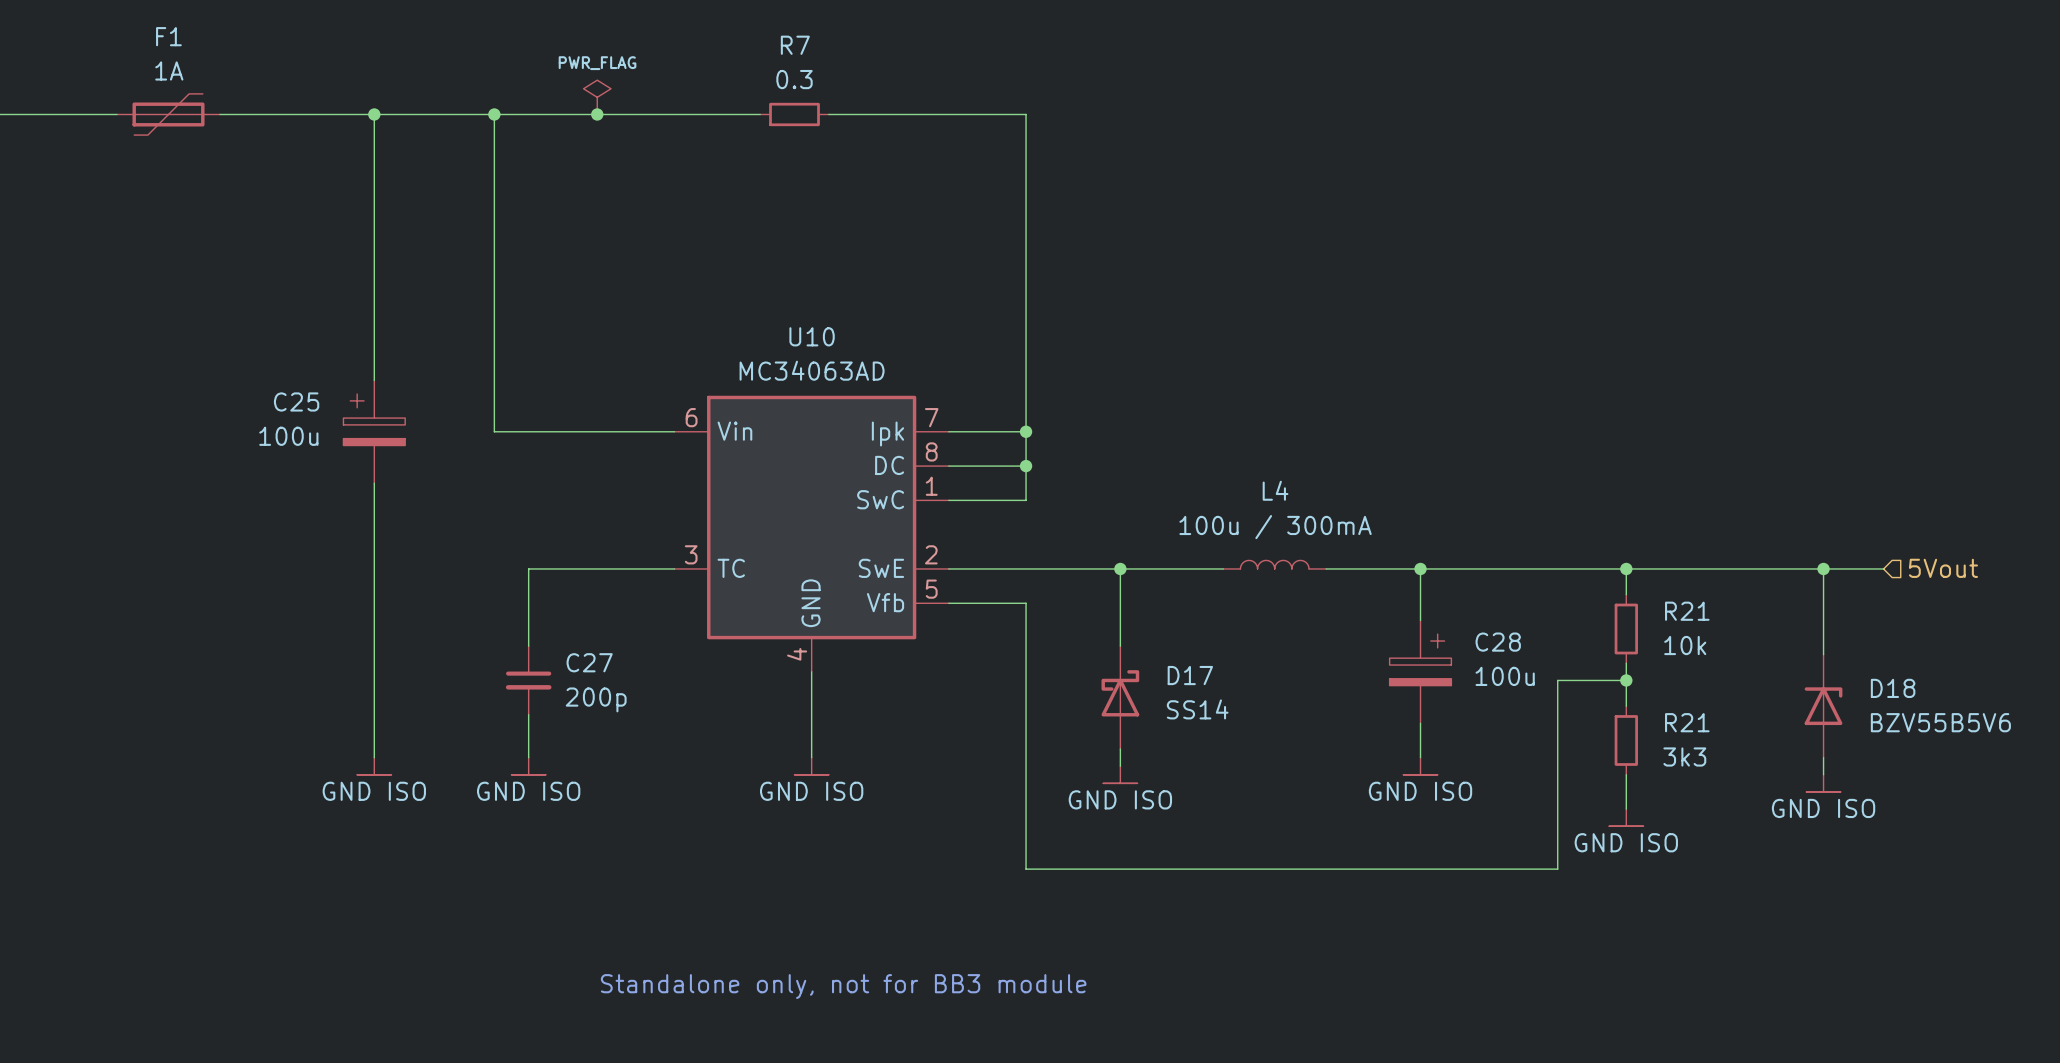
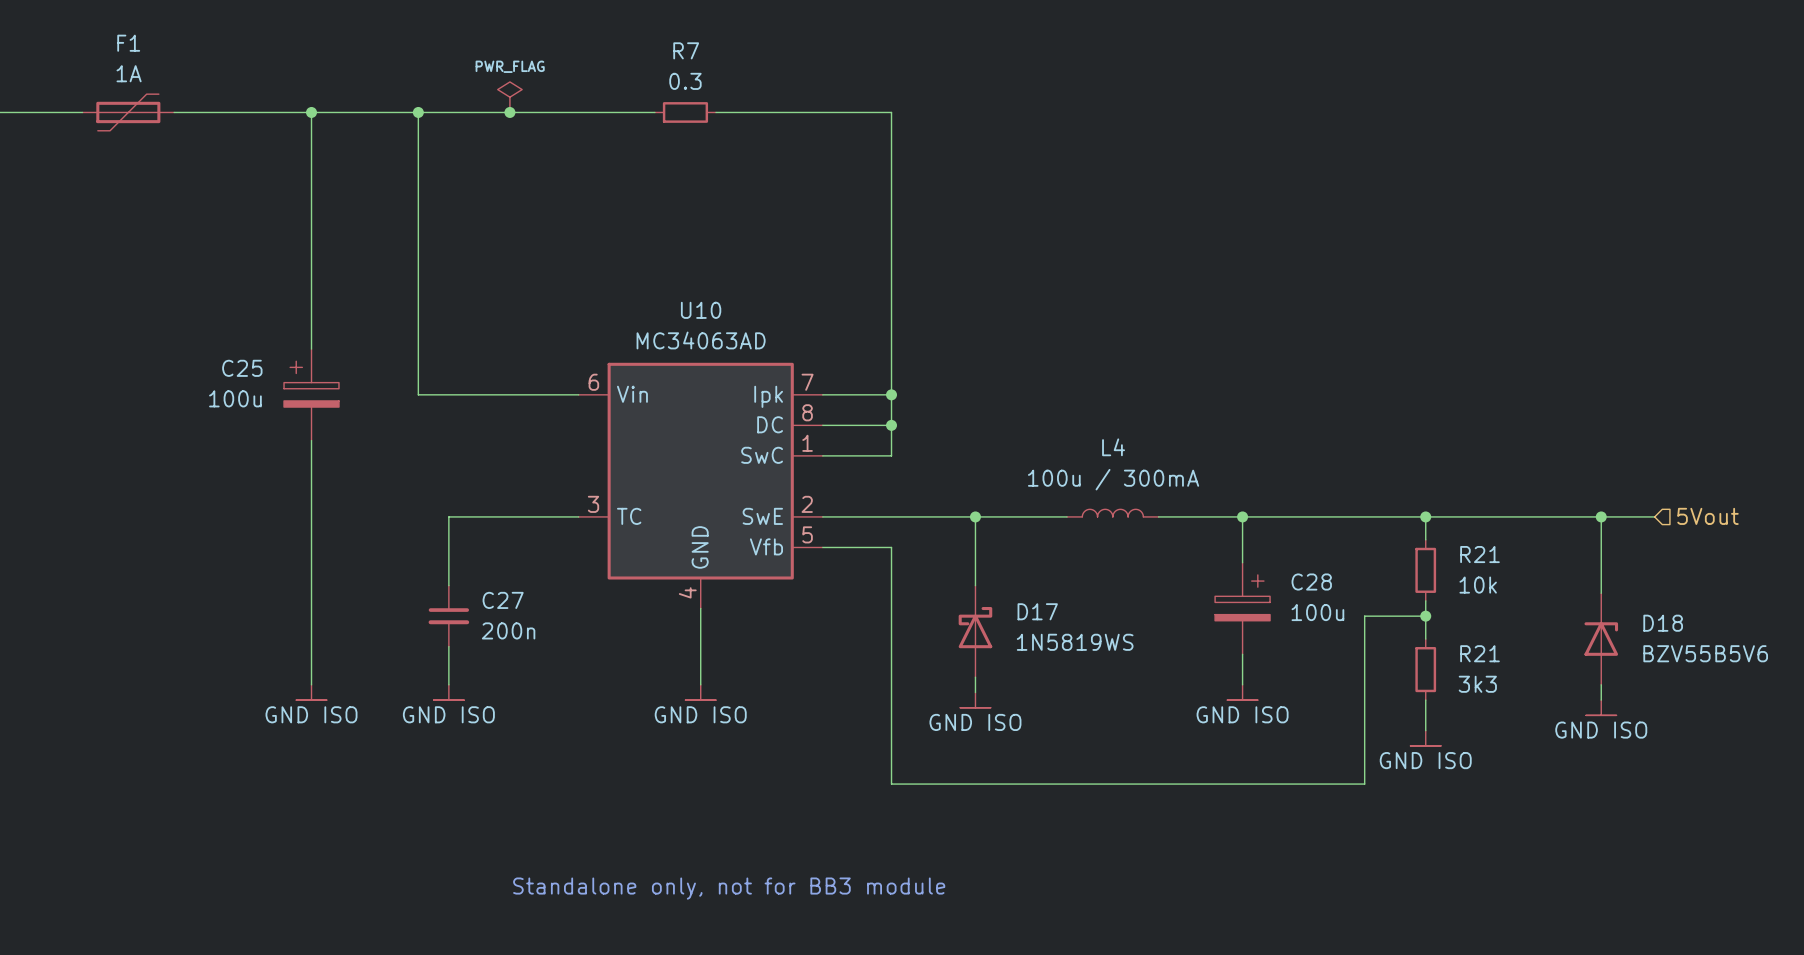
C27 value: 200p (596, 699) -> 200n (508, 630)
D17 value: SS14 (1197, 709) -> 1N5819WS (1075, 642)

